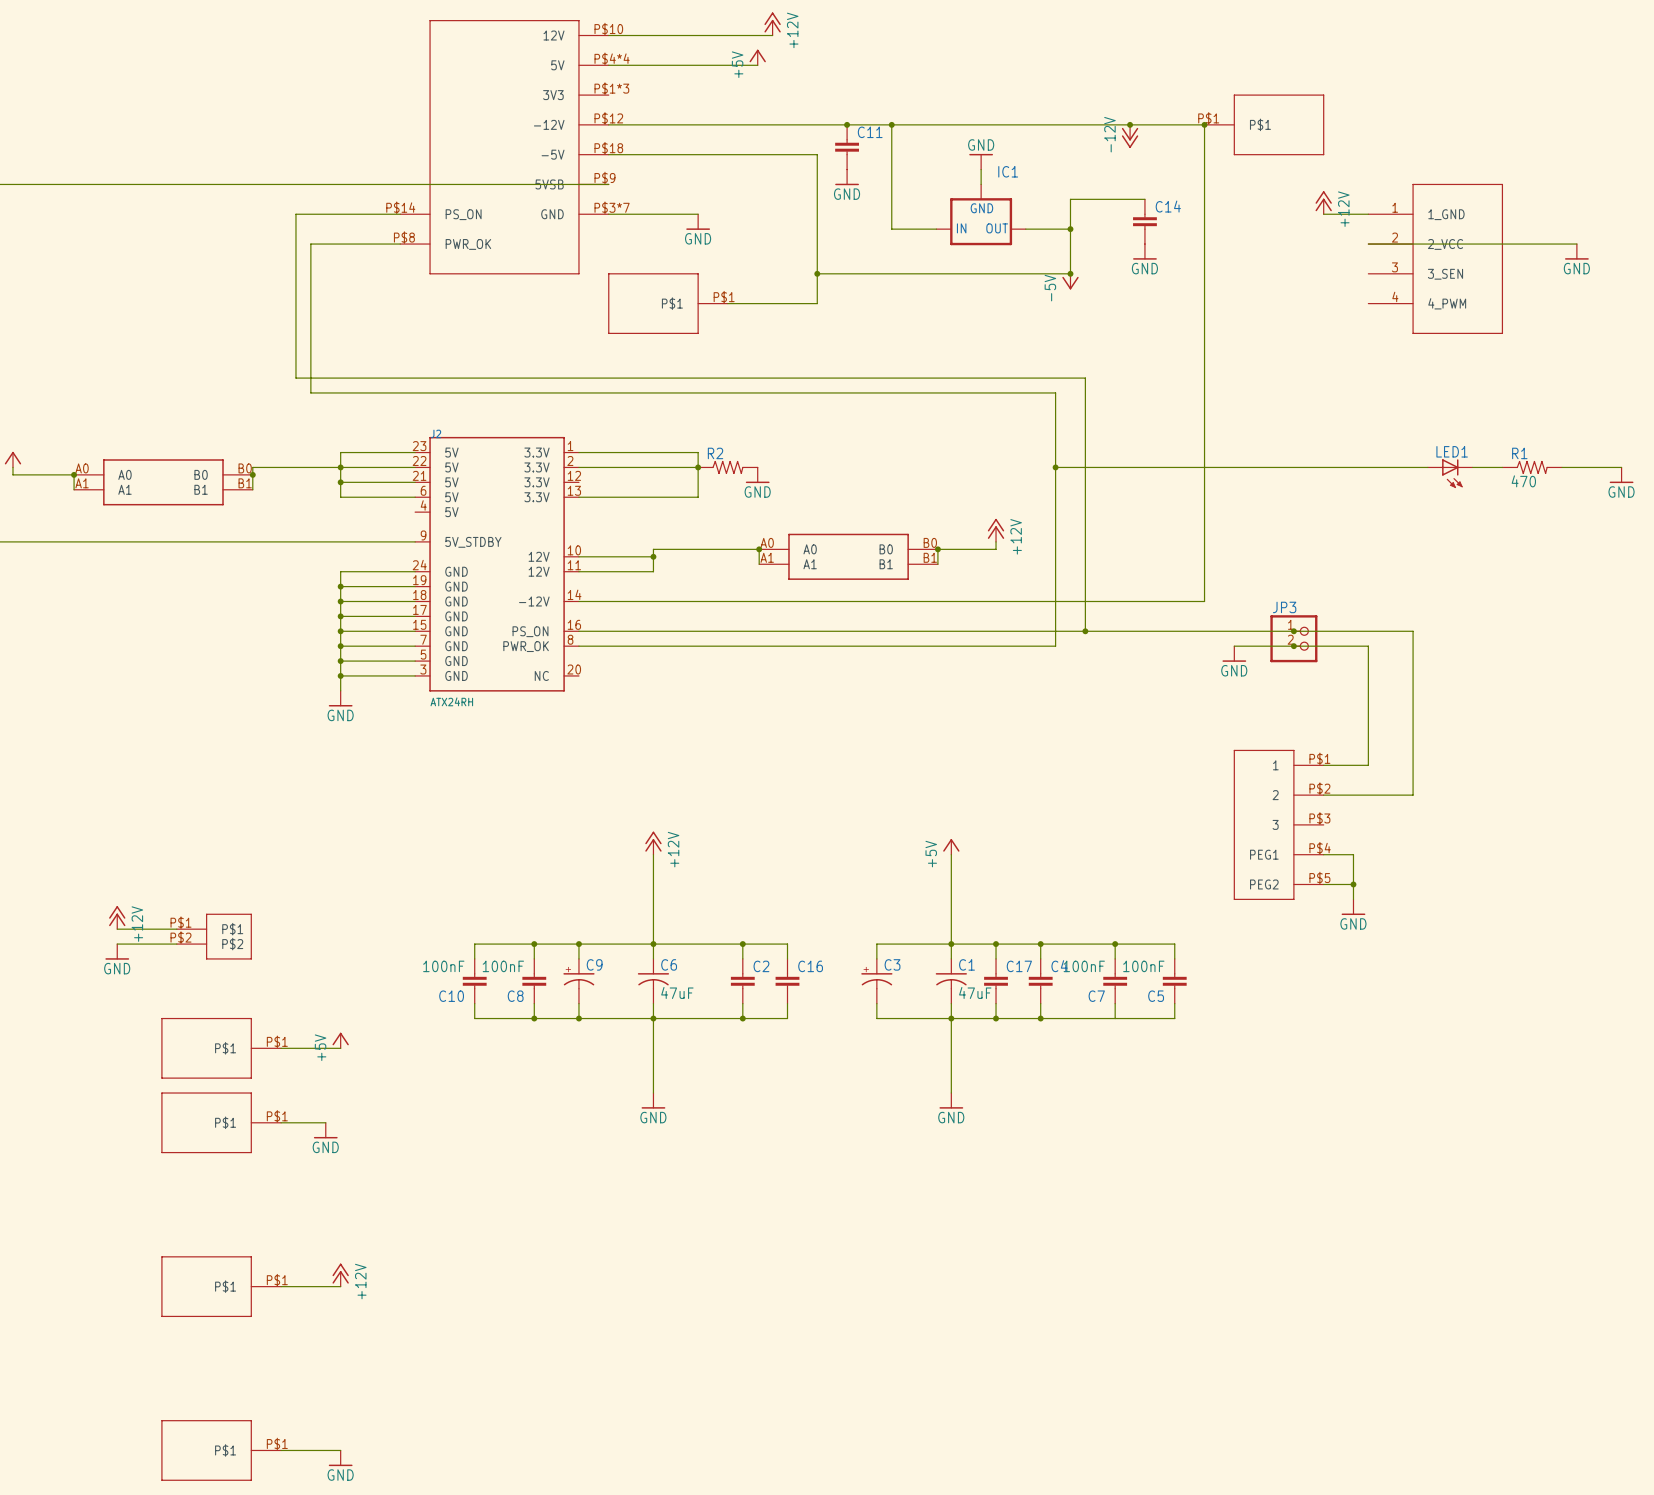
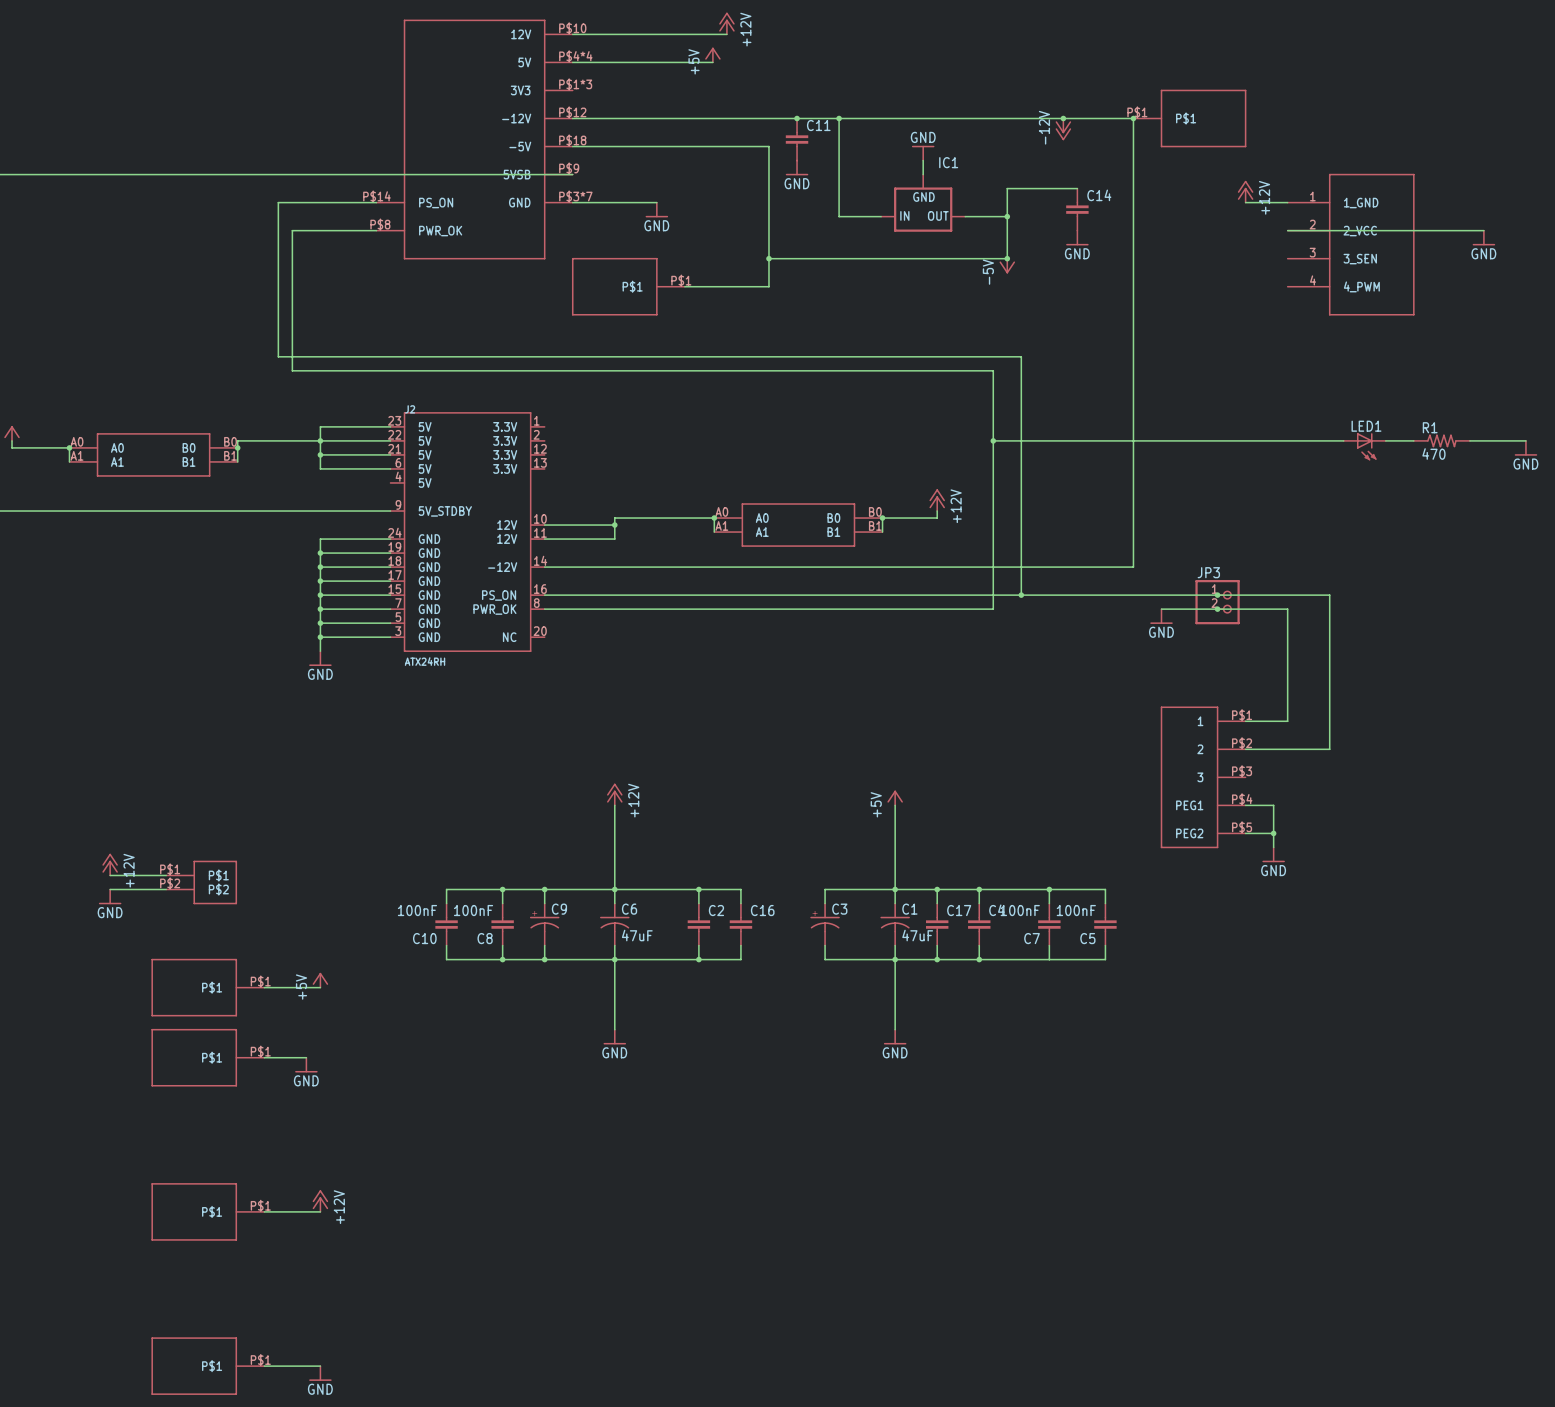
wire: (578, 452) (698, 452) (698, 497) (578, 497) -> none
wire: (578, 467) (698, 467) -> none
junction: (698, 467) -> none
R2: (727, 467) -> none
power symbol: GND (757, 475) -> none

